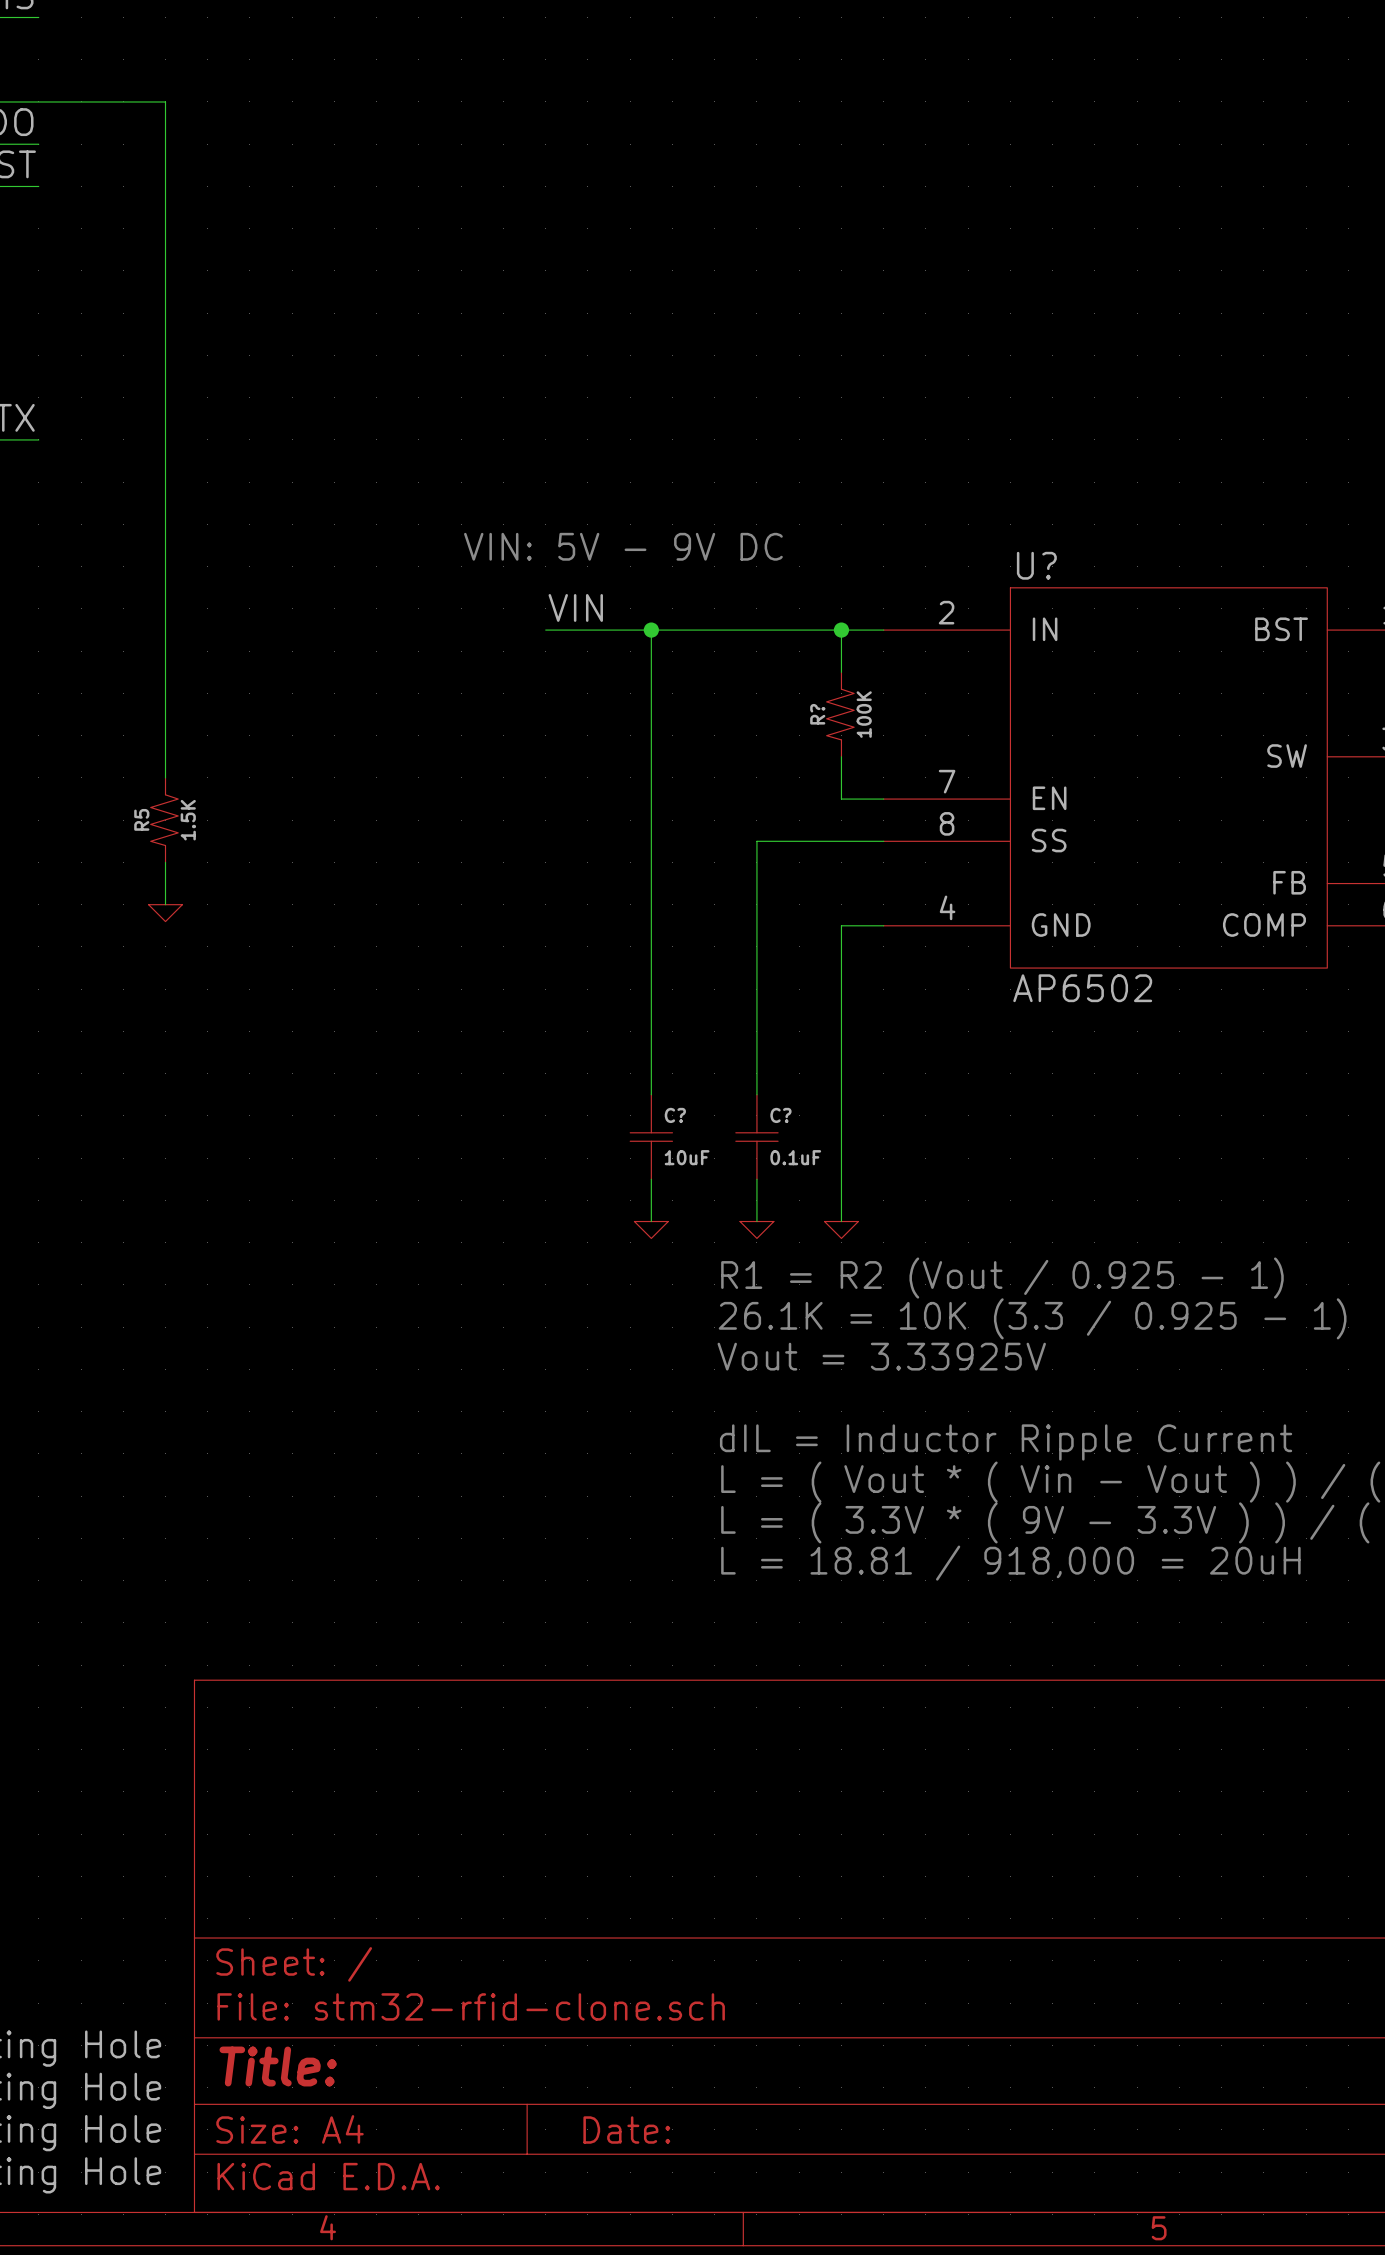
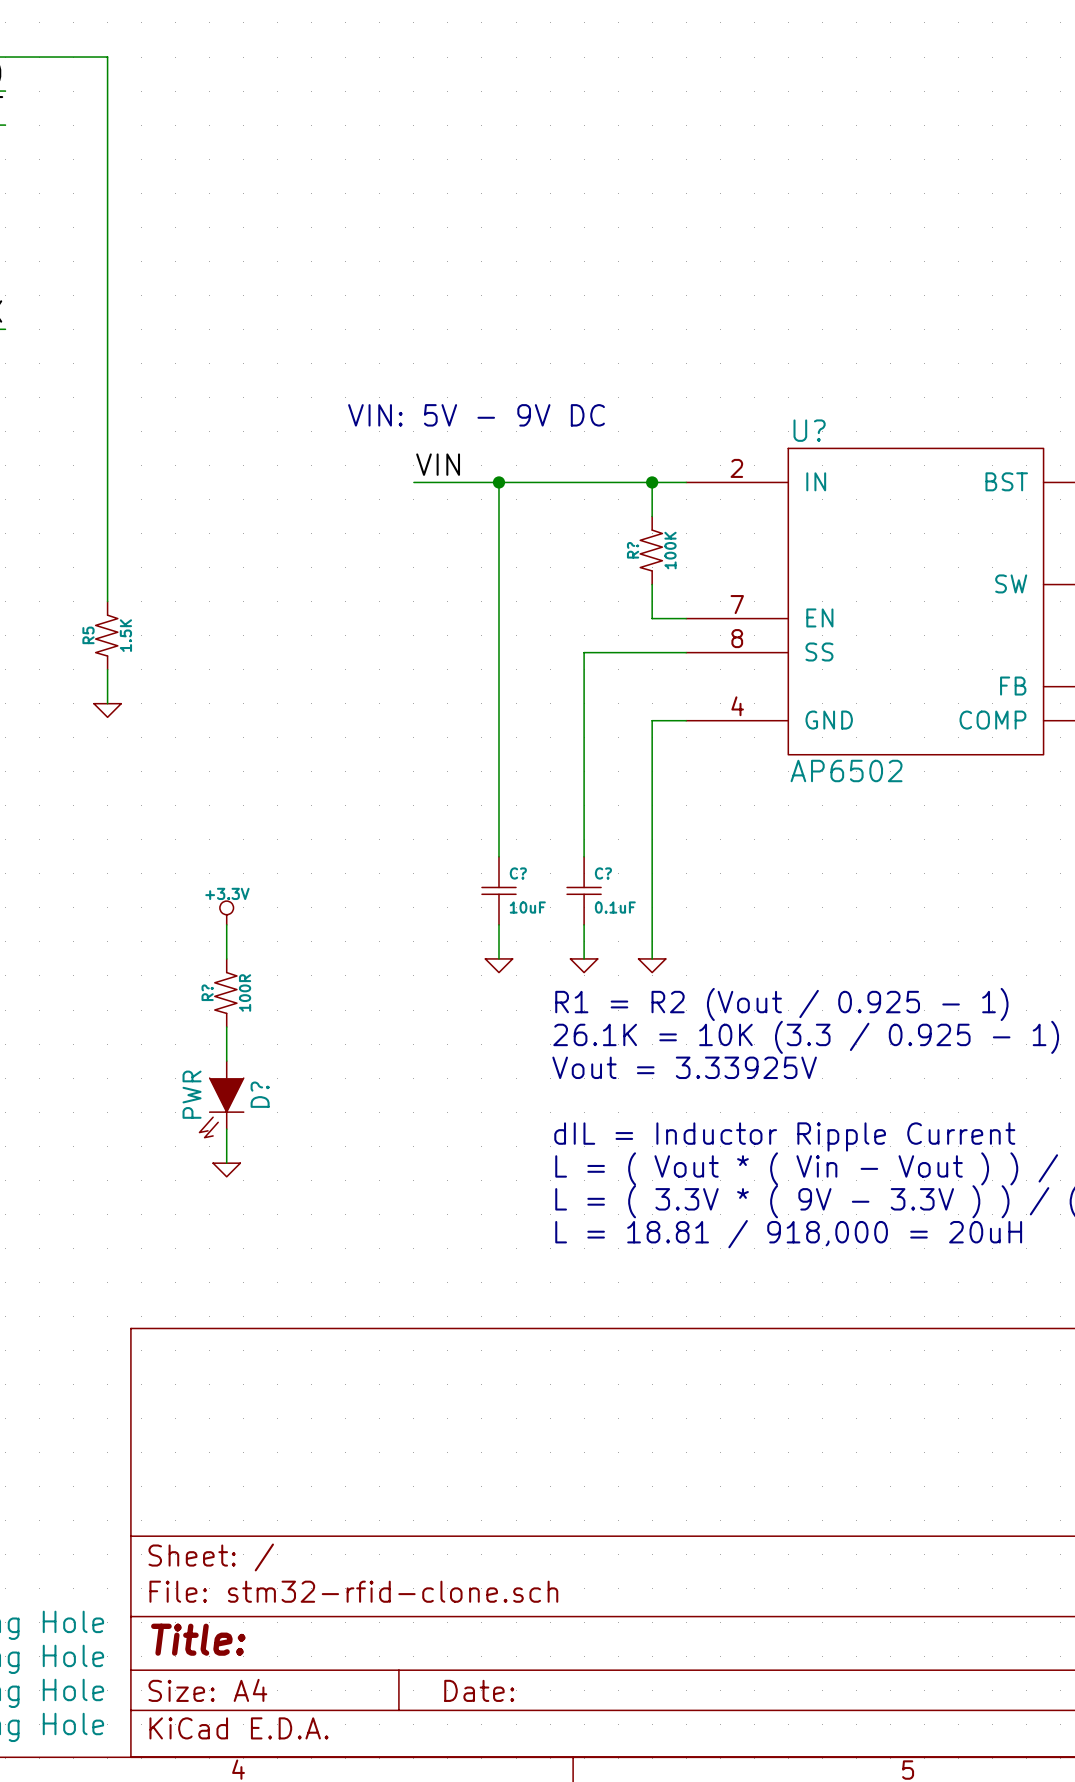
power symbol: none -> +3.3V (226, 913)
wire: none -> (226, 924) (226, 958)
R?: none -> 100R (225, 992)
wire: none -> (226, 1027) (226, 1061)
D?: none -> PWR (221, 1099)
wire: none -> (226, 1129) (226, 1163)
power symbol: none -> (226, 1169)

